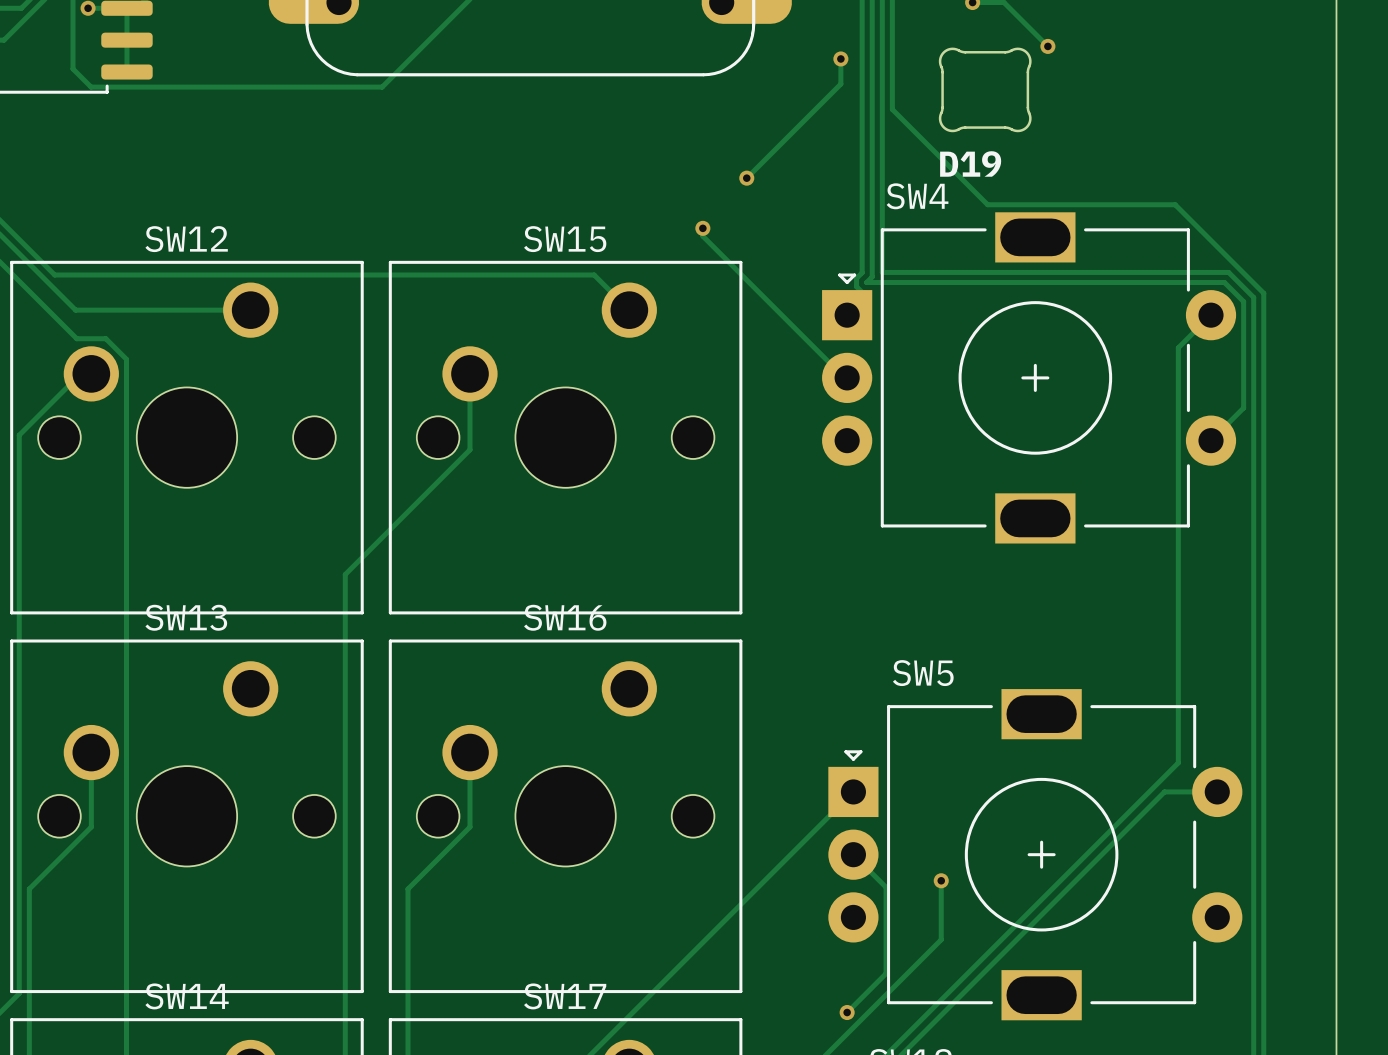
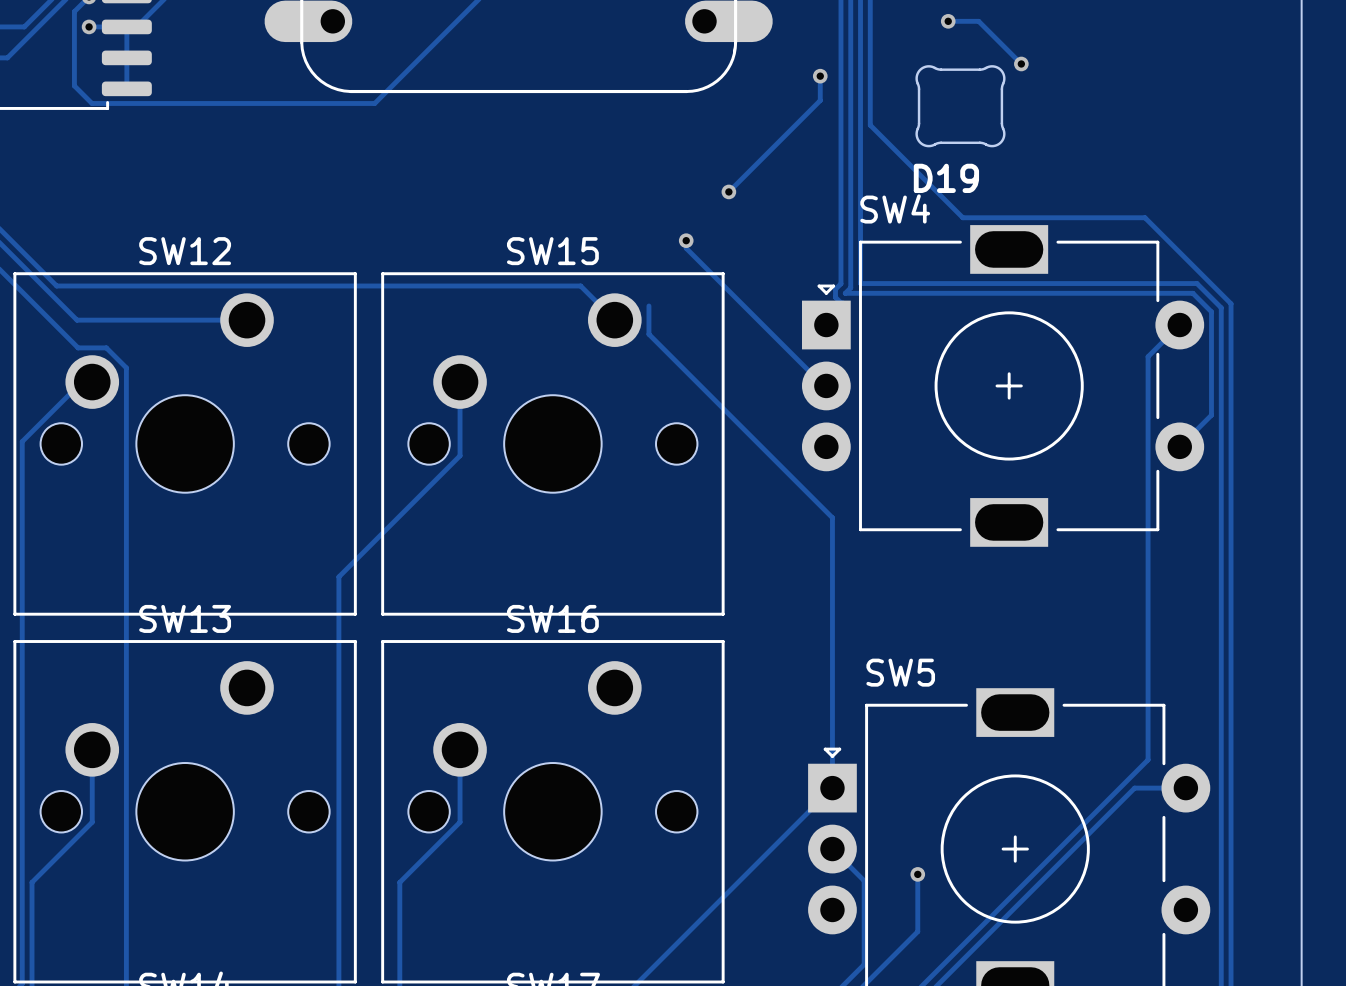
track: none -> (648, 306) (648, 334) (832, 517) (832, 788)

